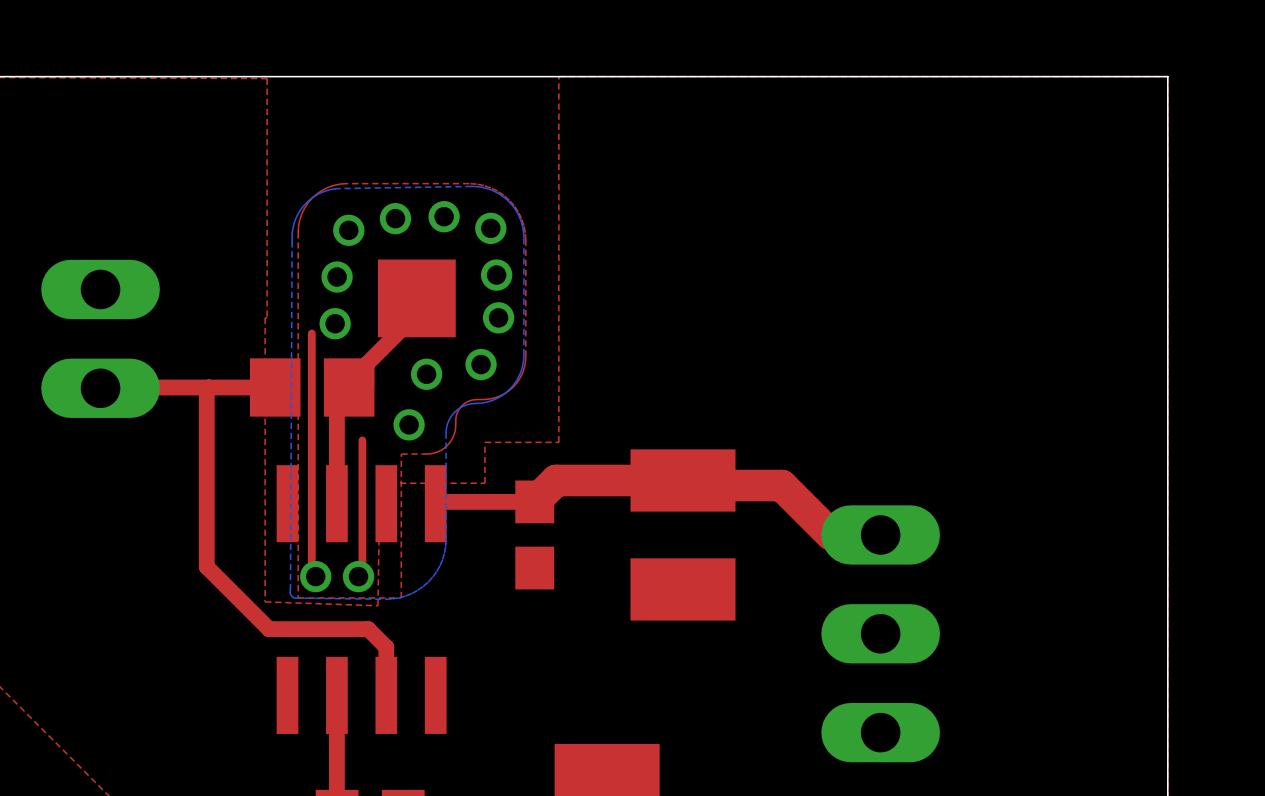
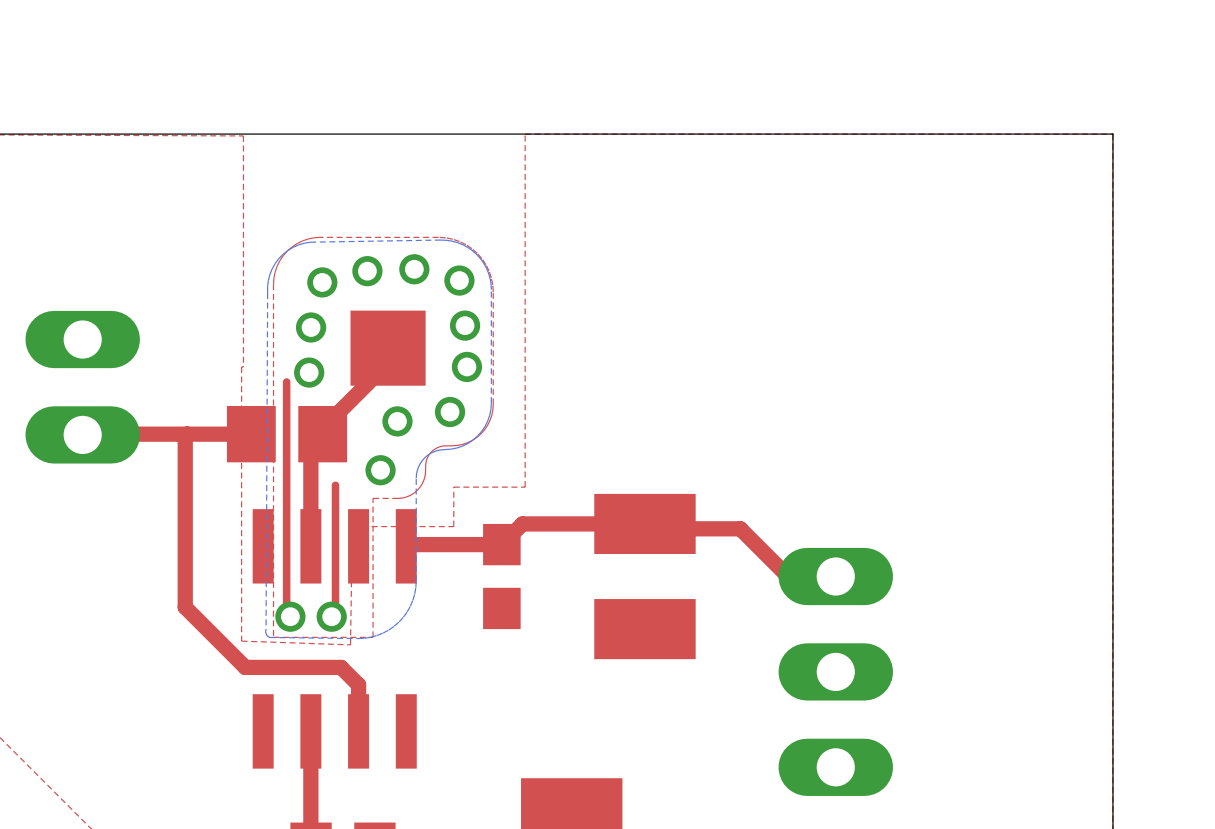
top track width: thick (683, 480) (556, 480) (534, 501) -> thin (644, 523) (522, 523) (501, 544)
top track width: thick (688, 485) (781, 485) (831, 534) -> thin (649, 528) (740, 528) (788, 576)

